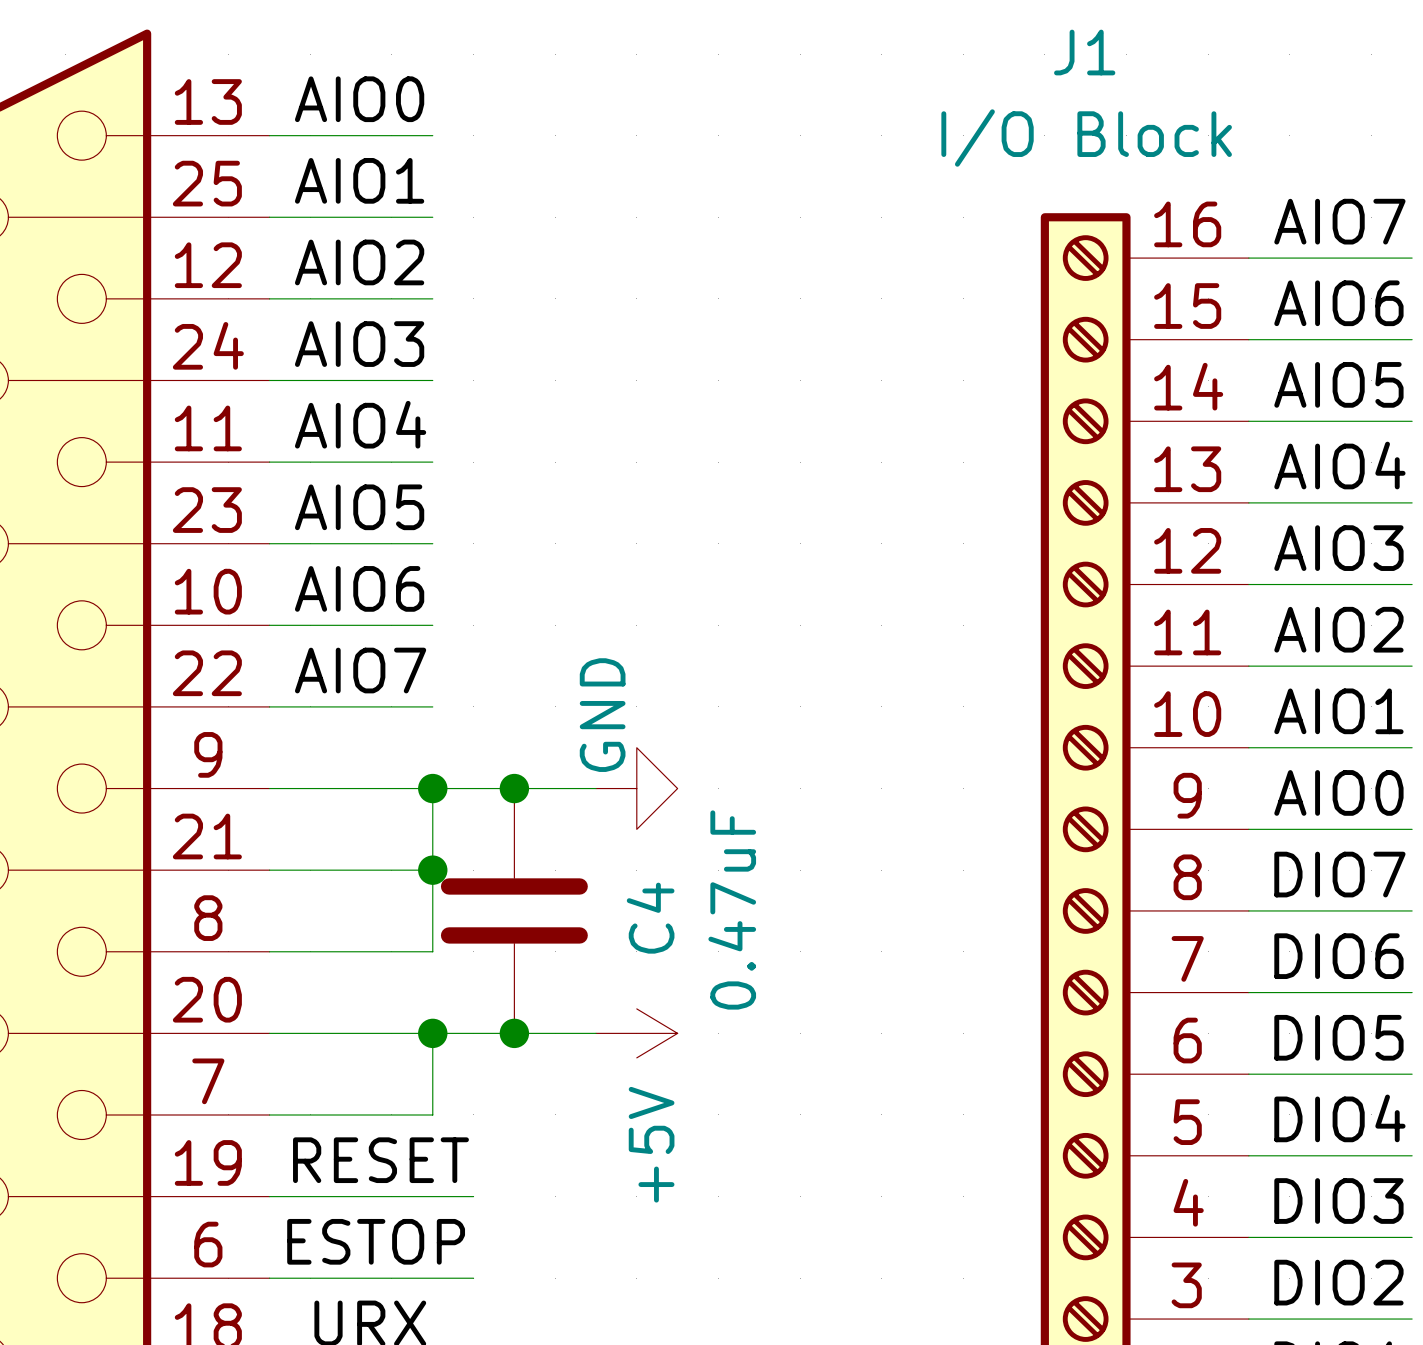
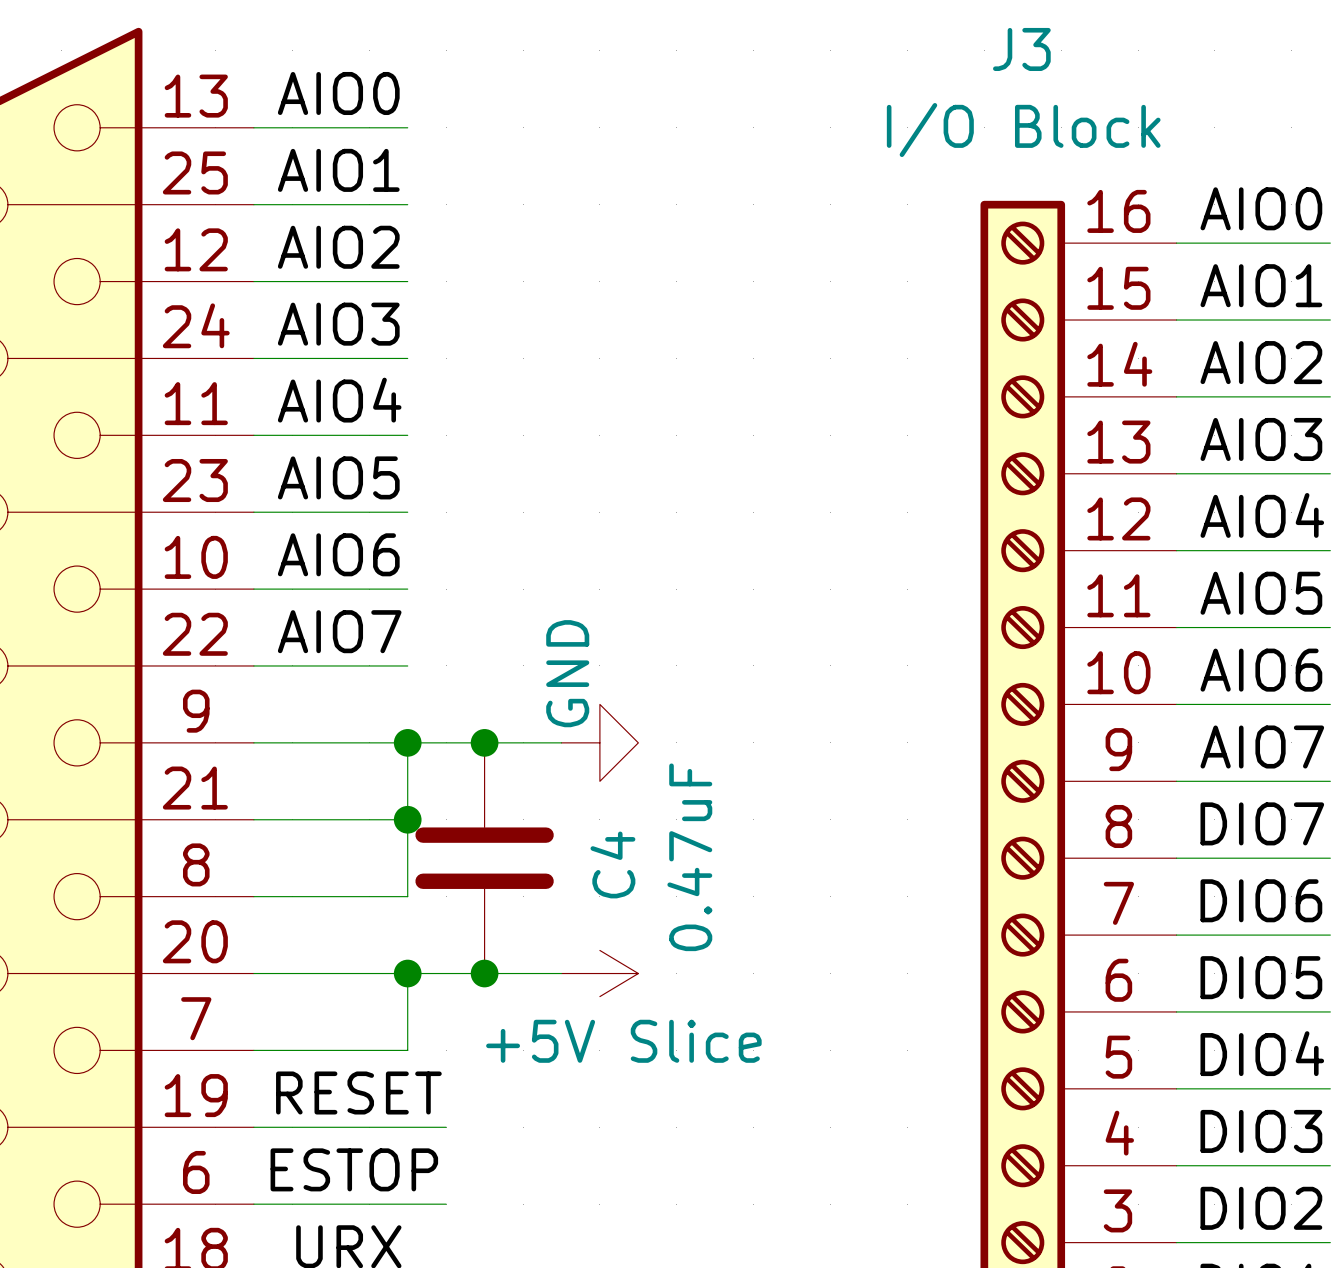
J1 name: J1 (1084, 52) -> J3 (1021, 49)
label: AIO7 (1339, 221) -> AIO0 (1261, 208)
label: AIO6 (1338, 303) -> AIO1 (1261, 285)
label: AIO5 (1338, 384) -> AIO2 (1261, 362)
label: AIO4 (1339, 465) -> AIO3 (1261, 439)
label: AIO3 (1338, 548) -> AIO4 (1262, 515)
label: AIO2 (1338, 629) -> AIO5 (1261, 593)
label: AIO1 (1338, 711) -> AIO6 (1261, 670)
label: AIO0 (1338, 792) -> AIO7 (1262, 747)
power symbol: +5V (636, 1033) -> +5V Slice (599, 973)

